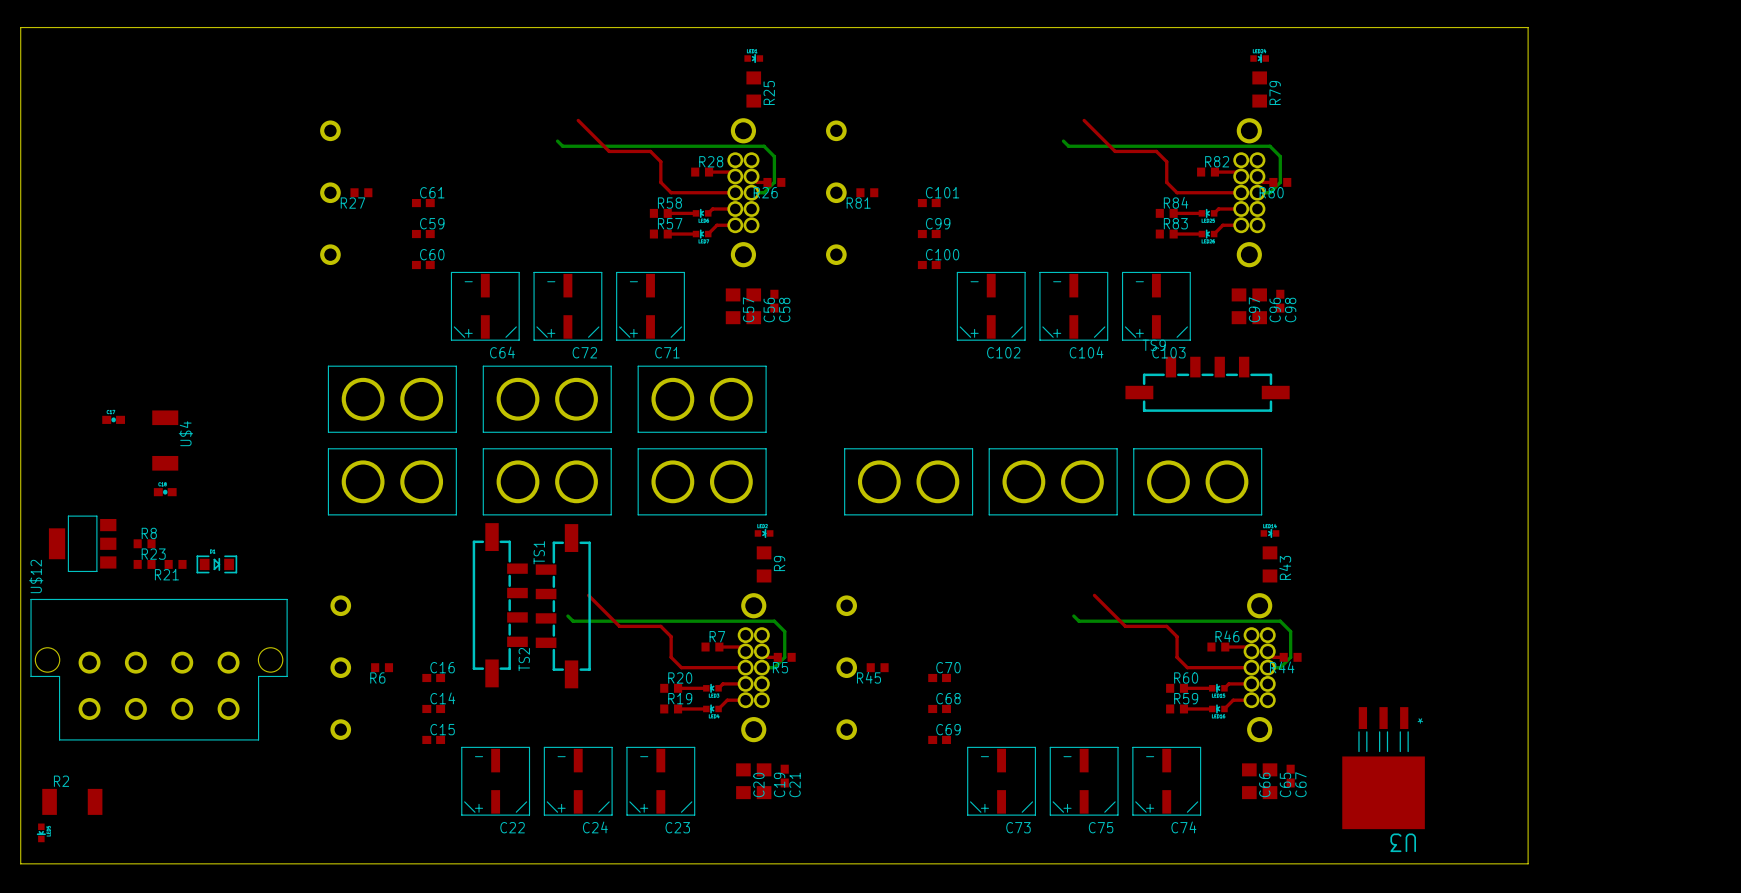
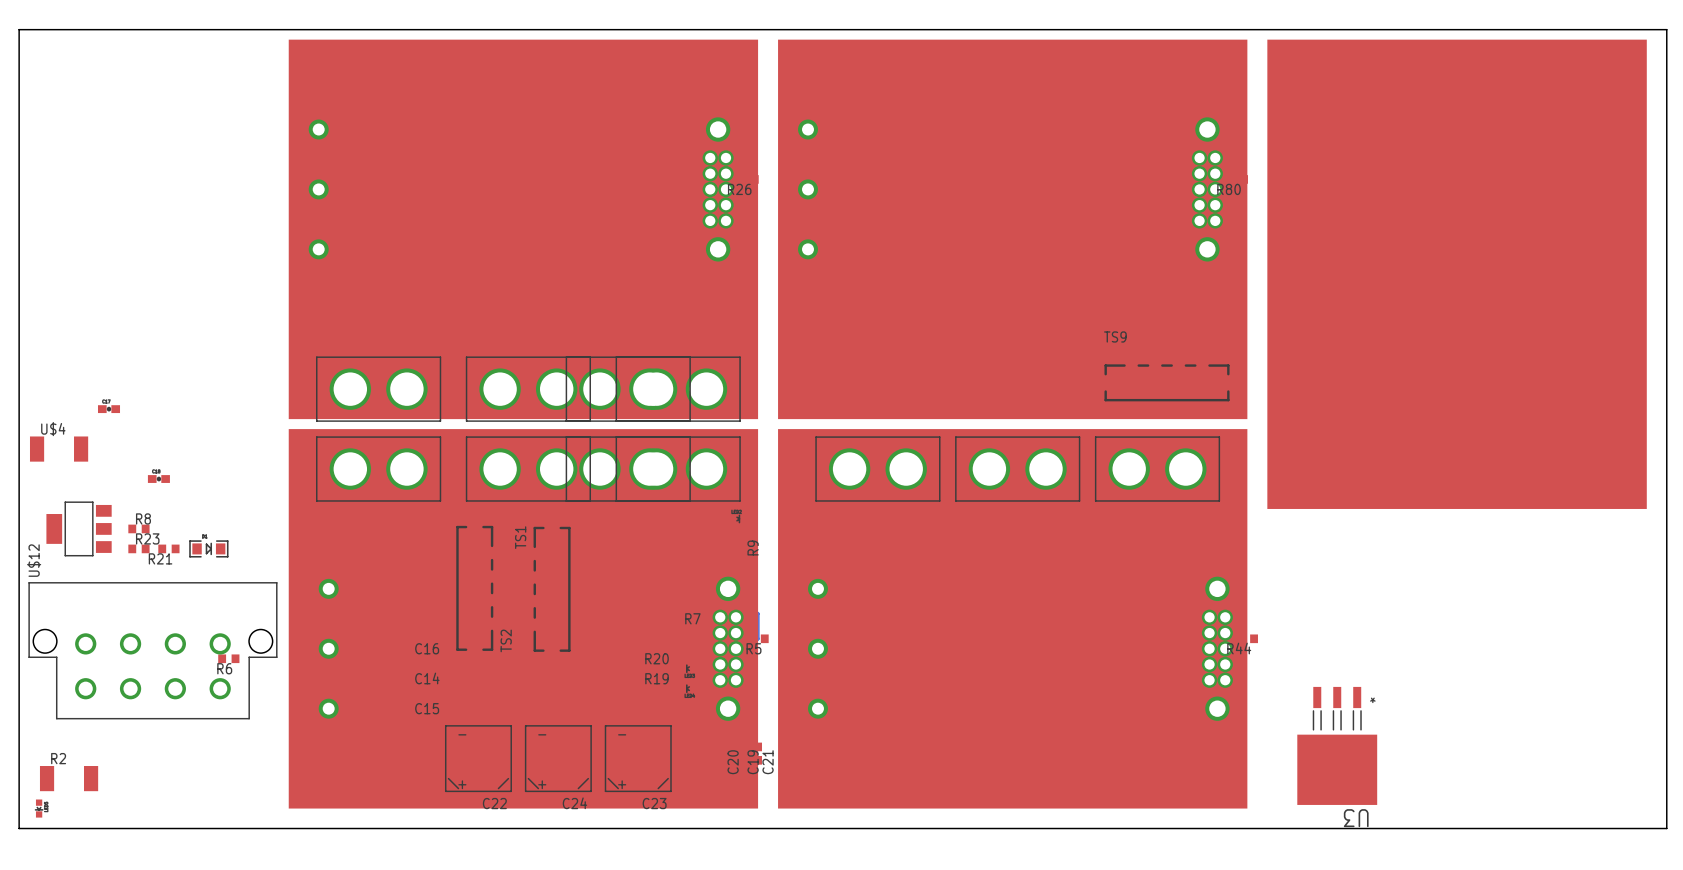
board edge: (1528, 27) (1528, 863) (20, 863) (20, 853) -> (1477, 29) (1666, 29) (1666, 828) (19, 828)
drawing: none -> [288, 39, 759, 420]
drawing: none -> [778, 39, 1248, 420]
drawing: none -> [1267, 39, 1647, 509]
part: (753, 58) -> none
part: (1259, 58) -> none
R25: (753, 89) -> none
R79: (1259, 89) -> none
top track: (578, 120) (609, 151) (650, 151) (660, 161) (660, 182) (671, 192) (735, 192) -> none
top track: (1084, 120) (1115, 151) (1156, 151) (1166, 161) (1166, 182) (1177, 192) (1241, 192) -> none
bottom track: (557, 141) (562, 146) (764, 146) (774, 156) (774, 182) (764, 192) (751, 192) -> none
bottom track: (1063, 141) (1068, 146) (1269, 146) (1280, 156) (1280, 182) (1269, 192) (1257, 192) -> none
R28: (702, 172) -> none
top track: (709, 172) (730, 172) (735, 176) -> none
R82: (1208, 172) -> none
top track: (1214, 172) (1236, 172) (1241, 176) -> none
R27: (361, 192) -> none
R81: (867, 192) -> none
C61: (423, 203) -> none
C101: (929, 203) -> none
top track: (735, 208) (712, 208) (708, 213) -> none
top track: (1241, 208) (1218, 208) (1214, 213) -> none
R58: (660, 213) -> none
top track: (667, 213) (696, 213) -> none
part: (702, 213) -> none
R84: (1166, 213) -> none
top track: (1173, 213) (1201, 213) -> none
part: (1208, 213) -> none
top track: (735, 225) (717, 225) (708, 234) -> none
top track: (1241, 225) (1222, 225) (1214, 234) -> none
C59: (423, 234) -> none
R57: (660, 234) -> none
top track: (667, 234) (696, 234) -> none
part: (702, 234) -> none
C99: (929, 234) -> none
R83: (1166, 234) -> none
top track: (1173, 234) (1201, 234) -> none
part: (1208, 234) -> none
C60: (423, 265) -> none
C100: (929, 265) -> none
C58: (774, 301) -> none
C98: (1280, 301) -> none
C64: (485, 306) -> none
C72: (567, 306) -> none
C71: (650, 306) -> none
C57: (733, 306) -> none
C56: (753, 306) -> none
C102: (991, 306) -> none
C104: (1073, 306) -> none
C103: (1156, 306) -> none
C97: (1239, 306) -> none
C96: (1259, 306) -> none
part: none -> (628, 389)
U$4 name position: U$4 (185, 433) -> U$4 (53, 429)
U$4 rotation: 0° (165, 440) -> 90° clockwise (59, 449)
U$4 position: (165, 440) -> (59, 449)
drawing: none -> [288, 429, 759, 809]
drawing: none -> [778, 429, 1248, 809]
part: none -> (628, 469)
part: (1269, 533) -> none
R43: (1269, 564) -> none
top track: (1094, 595) (1125, 626) (1166, 626) (1177, 636) (1177, 657) (1187, 667) (1251, 667) -> none
bottom track: (1073, 616) (1078, 621) (1280, 621) (1290, 631) (1290, 657) (1280, 667) (1267, 667) -> none
R46: (1218, 647) -> none
top track: (1225, 647) (1247, 647) (1251, 651) -> none
R6 position: (382, 667) -> (228, 658)
R45: (877, 667) -> none
C70: (939, 678) -> none
top track: (1251, 683) (1228, 683) (1224, 688) -> none
R60: (1177, 688) -> none
top track: (1183, 688) (1212, 688) -> none
part: (1218, 688) -> none
top track: (1251, 700) (1233, 700) (1224, 708) -> none
C68: (939, 708) -> none
R59: (1177, 708) -> none
top track: (1183, 708) (1212, 708) -> none
part: (1218, 708) -> none
C69: (939, 739) -> none
C67: (1290, 776) -> none
C73: (1001, 781) -> none
C75: (1084, 781) -> none
C74: (1166, 781) -> none
C66: (1249, 781) -> none
C65: (1269, 781) -> none

